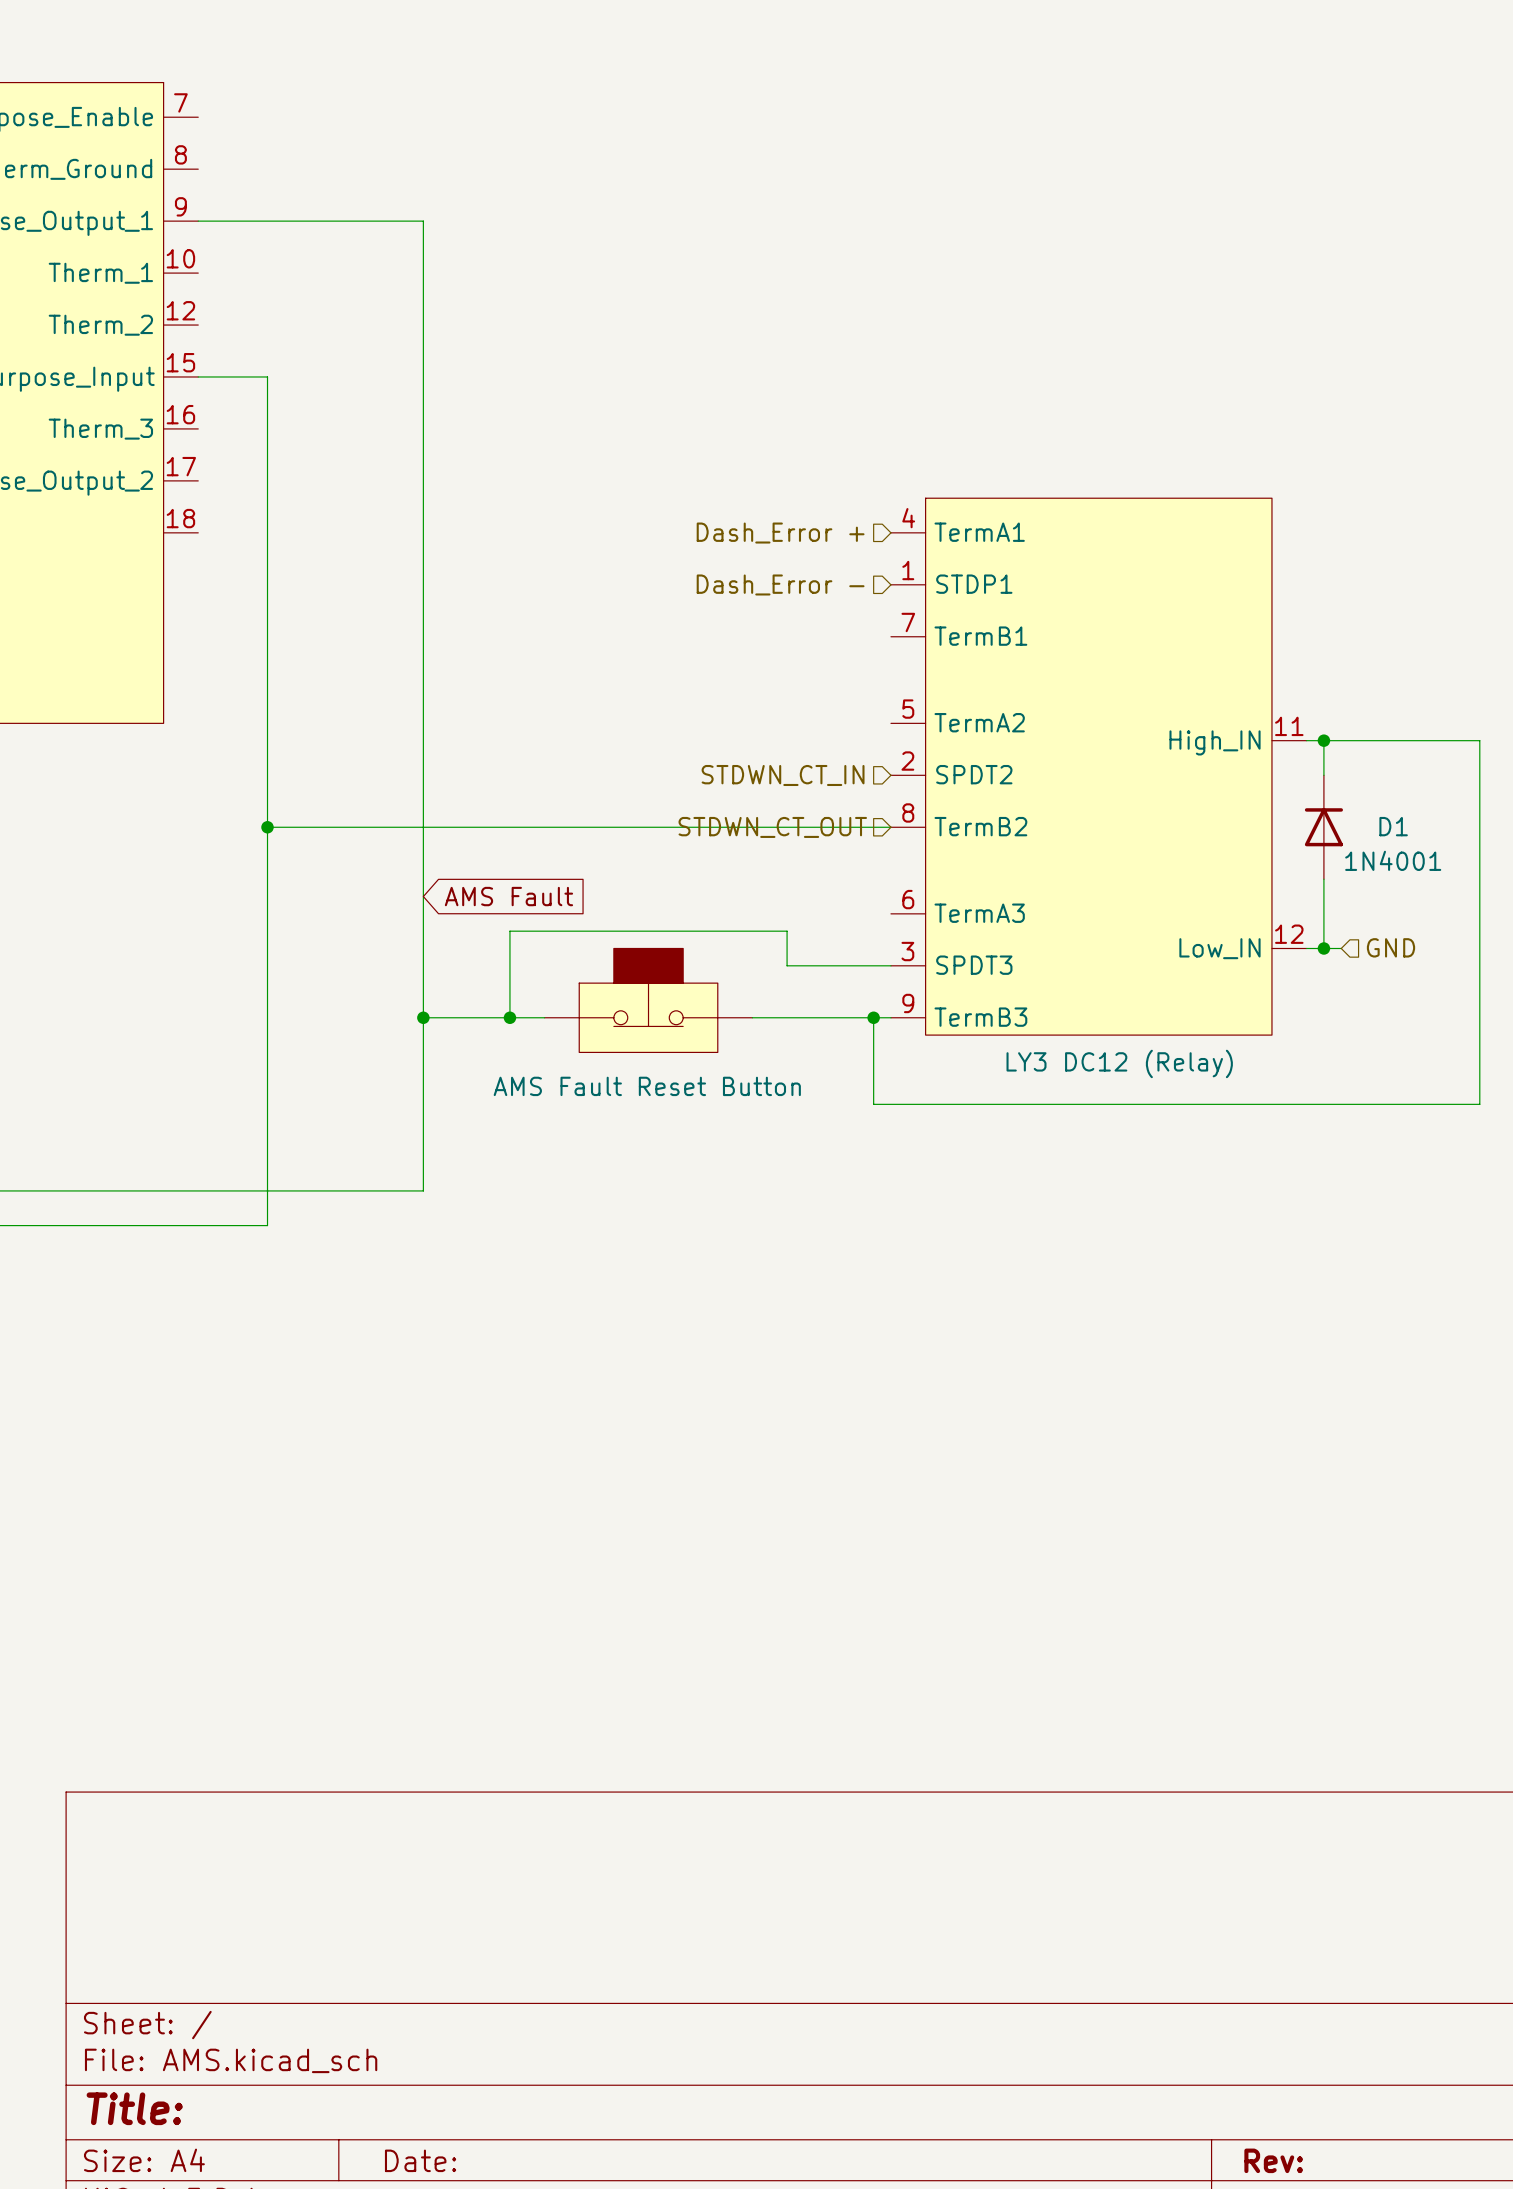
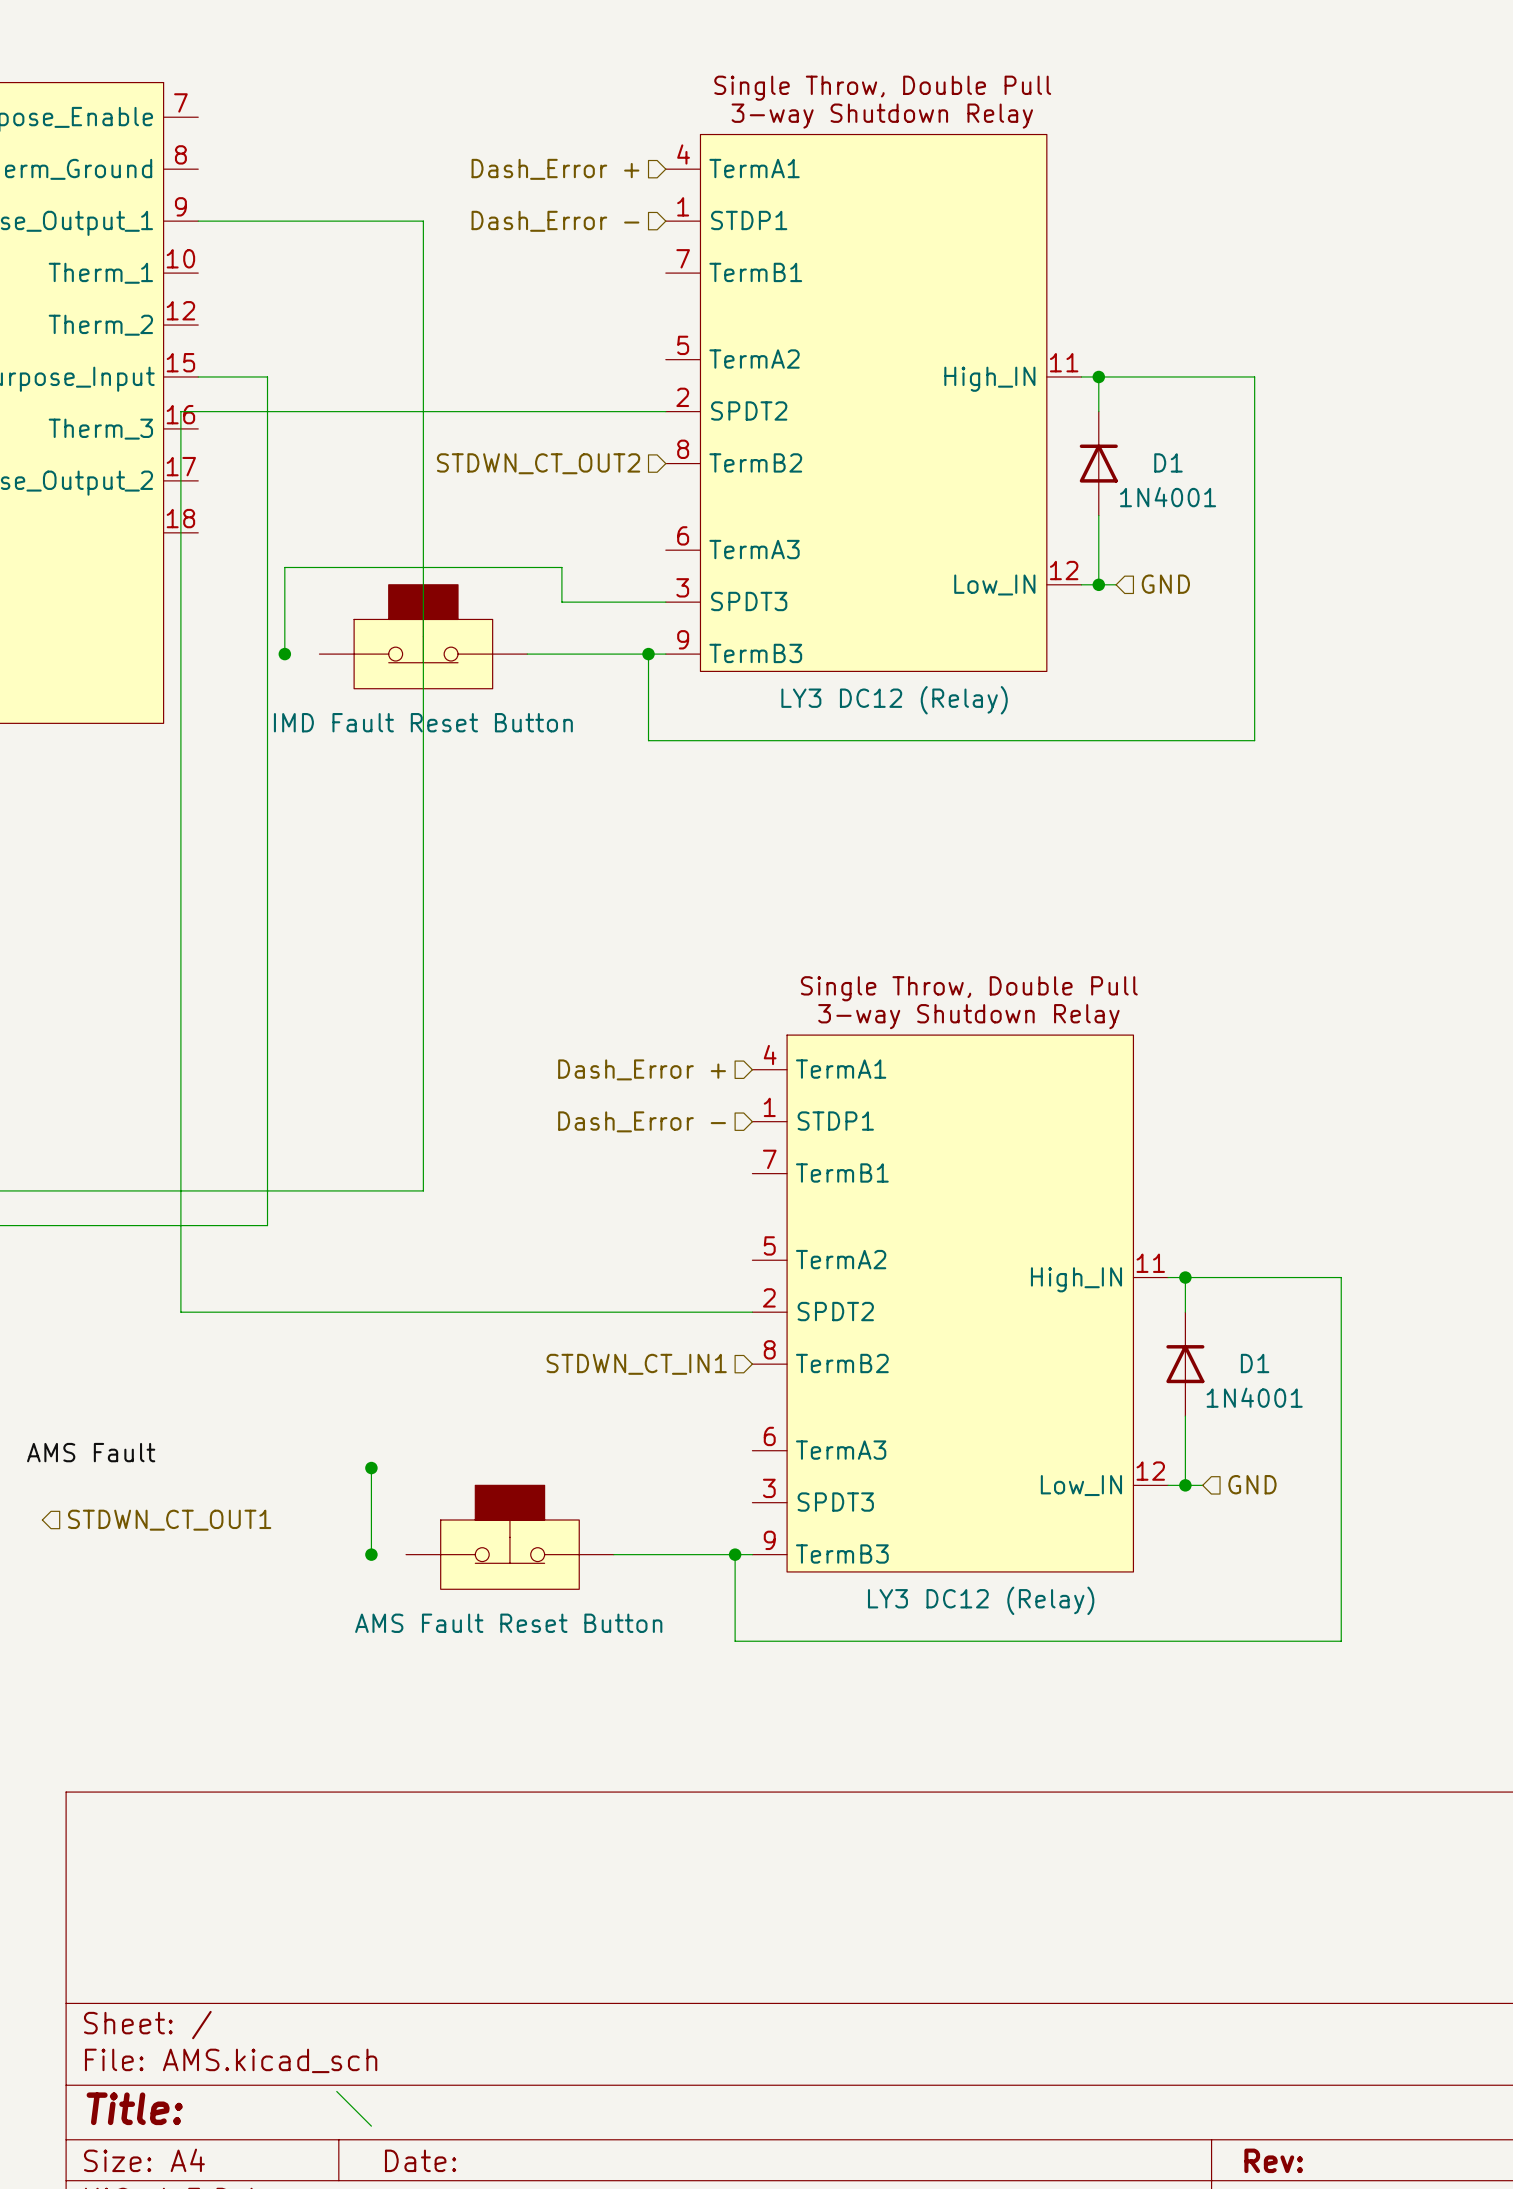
hierarchical label: none -> Dash_Error + (555, 169)
hierarchical label: none -> Dash_Error - (555, 221)
wire: none -> (1081, 376) (1254, 376) (1254, 740) (648, 740) (648, 654)
wire: none -> (1098, 376) (1098, 411)
junction: none -> (1098, 376)
part: none -> LY3 DC12 (Relay) (873, 402)
wire: none -> (665, 411) (180, 411) (180, 1312) (752, 1312)
hierarchical label: none -> STDWN_CT_OUT2 (538, 463)
D1: none -> 1N4001 (1098, 463)
hierarchical label: Dash_Error + (780, 533) -> none
hierarchical label: Dash_Error - (780, 584) -> none
junction: none -> (1098, 584)
hierarchical label: none -> GND (1165, 584)
wire: none -> (665, 602) (561, 602) (561, 567) (284, 567) (284, 654)
part: none -> IMD Fault Reset Button (423, 636)
junction: none -> (284, 654)
wire: none -> (527, 654) (665, 654)
junction: none -> (648, 654)
wire: (1306, 740) (1479, 740) (1479, 1104) (873, 1104) (873, 1017) -> none
wire: (1323, 740) (1323, 775) -> none
junction: (1323, 740) -> none
part: LY3 DC12 (Relay) (1098, 766) -> none
hierarchical label: STDWN_CT_IN (783, 775) -> none
wire: (267, 827) (890, 827) -> none
junction: (267, 827) -> none
hierarchical label: STDWN_CT_OUT (772, 827) -> none
D1: 1N4001 (1323, 827) -> none
wire: (1323, 879) (1323, 948) -> none
global label: AMS Fault (508, 896) -> none
hierarchical label: GND (1391, 947) -> none
wire: (1306, 948) (1341, 948) -> none
junction: (1323, 948) -> none
wire: (890, 965) (787, 965) (787, 931) (509, 931) (509, 1017) -> none
part: AMS Fault Reset Button (648, 1000) -> none
wire: (423, 1017) (544, 1017) -> none
junction: (423, 1017) -> none
junction: (509, 1017) -> none
wire: (752, 1017) (890, 1017) -> none
junction: (873, 1017) -> none
hierarchical label: none -> Dash_Error + (642, 1069)
hierarchical label: none -> Dash_Error - (642, 1121)
wire: none -> (1168, 1277) (1341, 1277) (1341, 1641) (735, 1641) (735, 1554)
wire: none -> (1185, 1277) (1185, 1312)
junction: none -> (1185, 1277)
part: none -> LY3 DC12 (Relay) (960, 1303)
hierarchical label: none -> STDWN_CT_IN1 (636, 1364)
D1: none -> 1N4001 (1185, 1364)
wire: none -> (1185, 1416) (1185, 1485)
label: none -> AMS Fault (91, 1452)
wire: none -> (371, 1468) (371, 1554)
junction: none -> (371, 1468)
hierarchical label: none -> GND (1252, 1484)
wire: none -> (1168, 1485) (1202, 1485)
junction: none -> (1185, 1485)
hierarchical label: none -> STDWN_CT_OUT1 (169, 1520)
part: none -> AMS Fault Reset Button (509, 1537)
junction: none -> (371, 1554)
wire: none -> (613, 1554) (752, 1554)
junction: none -> (735, 1554)
wire: none -> (336, 2091) (371, 2126)

